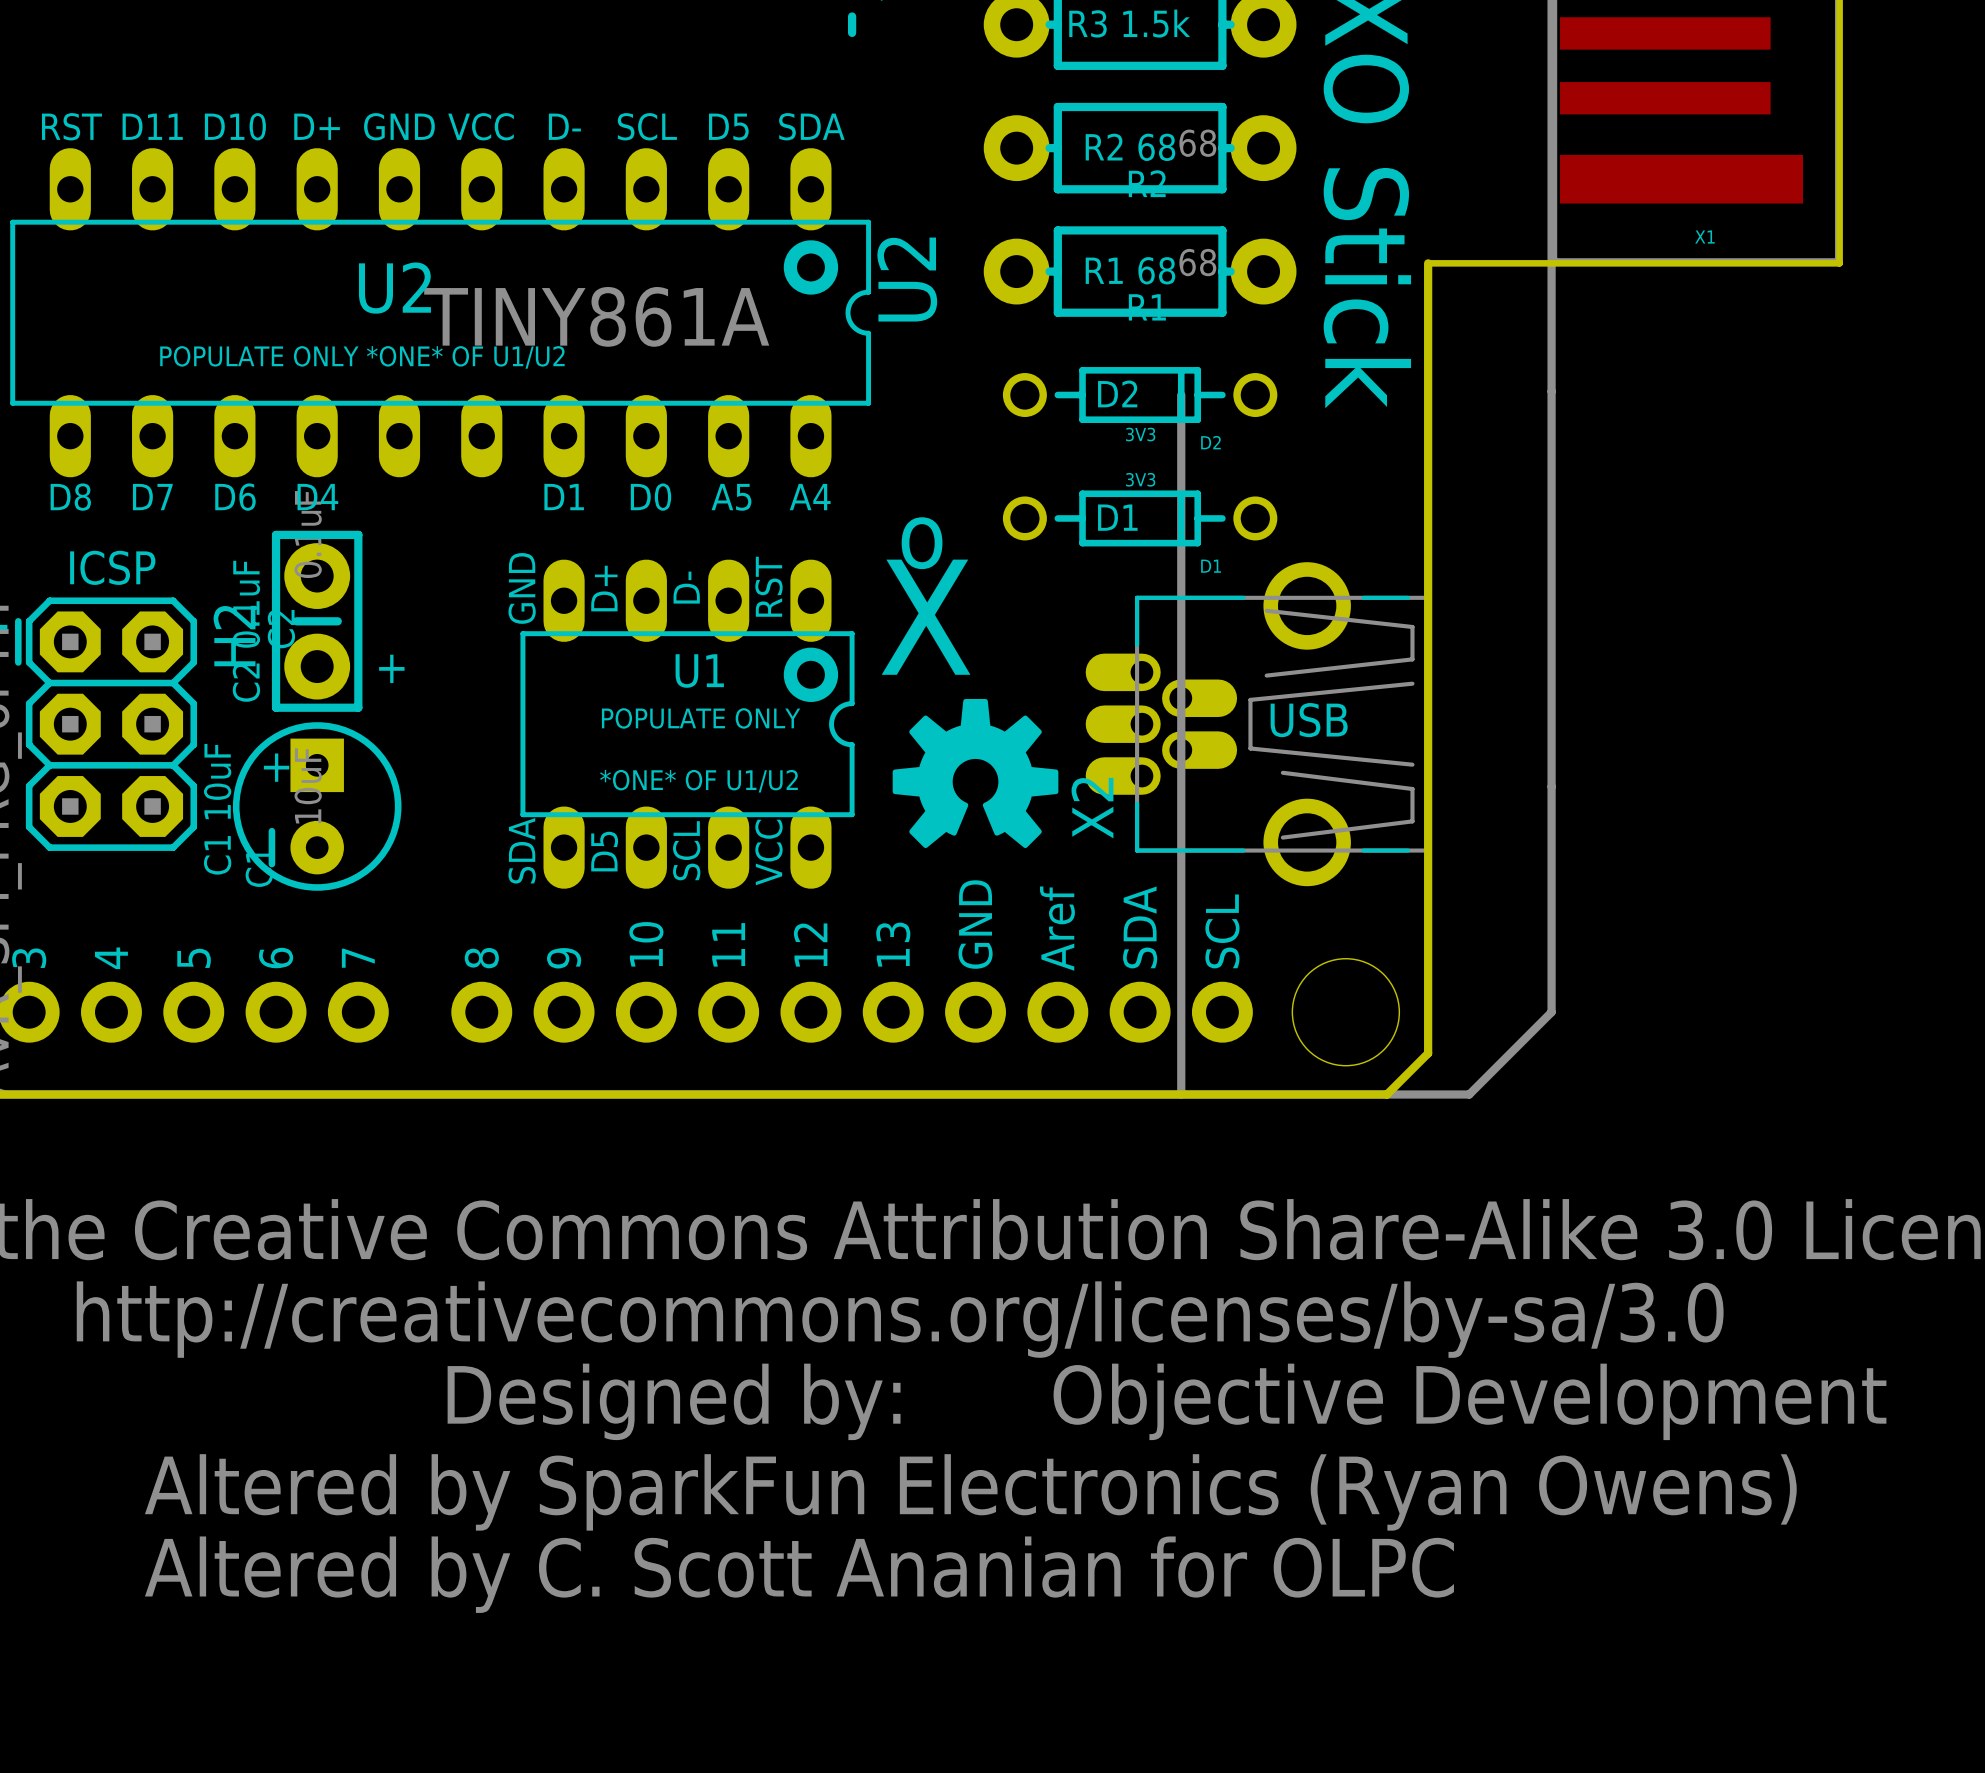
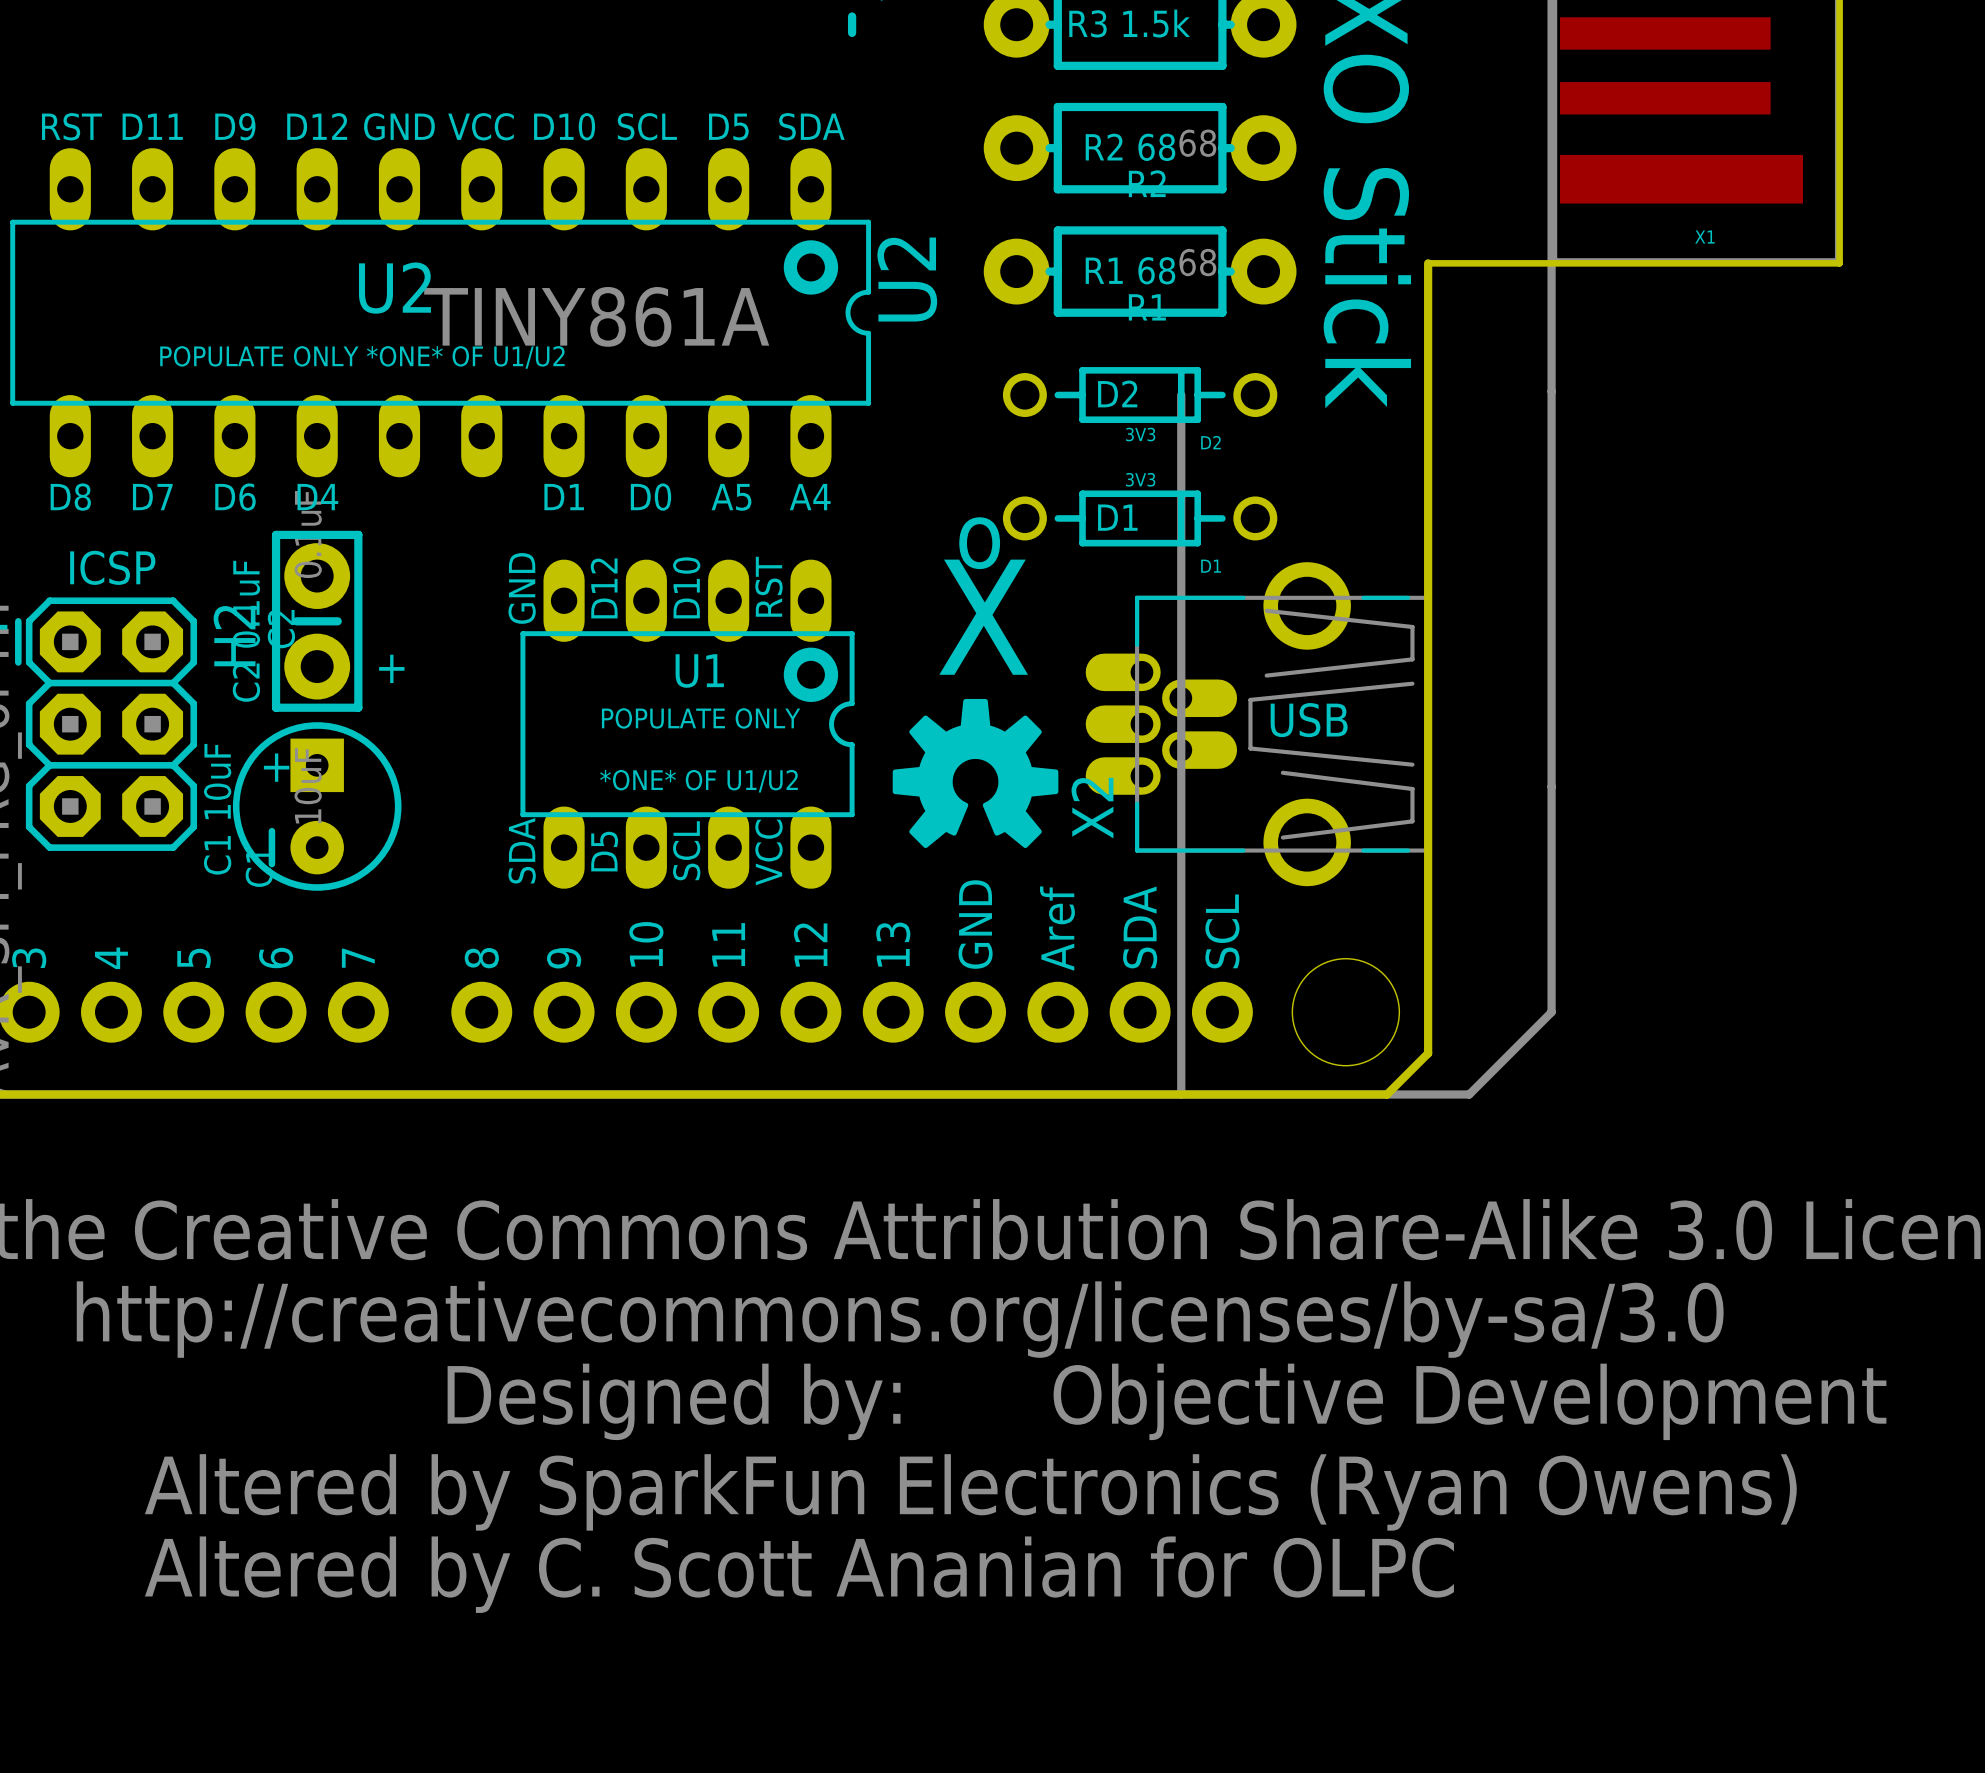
text: D10 (235, 126) -> D9 (235, 126)
text: D+ (317, 126) -> D12 (317, 126)
text: D- (564, 126) -> D10 (564, 126)
text position: o (922, 543) -> o (979, 543)
text: D- (686, 587) -> D10 (686, 587)
text: D+ (604, 588) -> D12 (604, 588)
text position: X (926, 617) -> X (983, 617)

